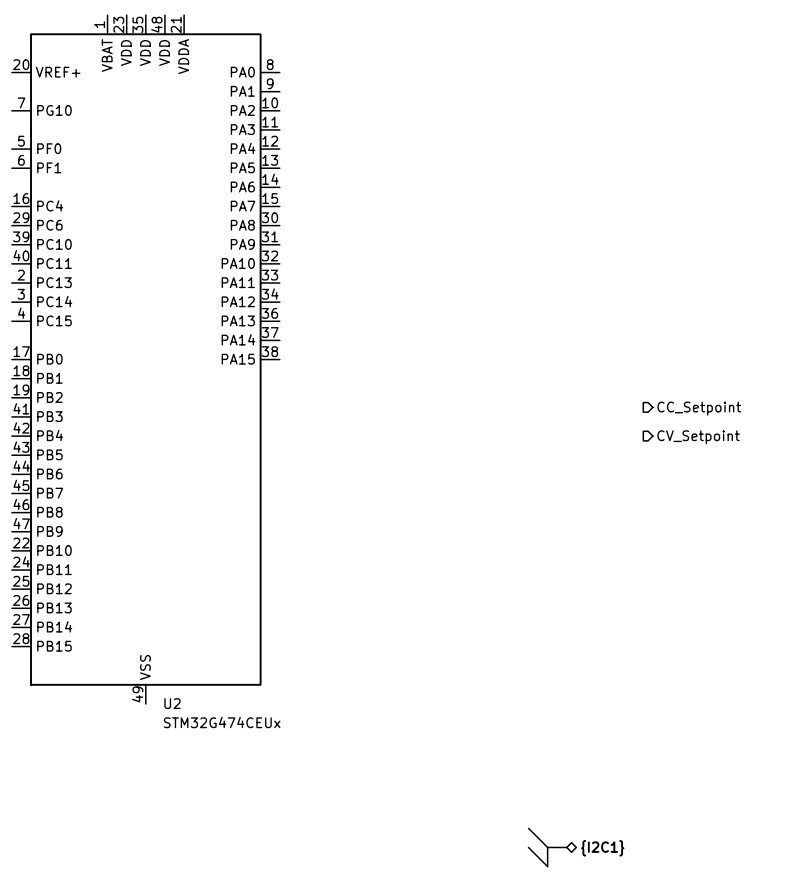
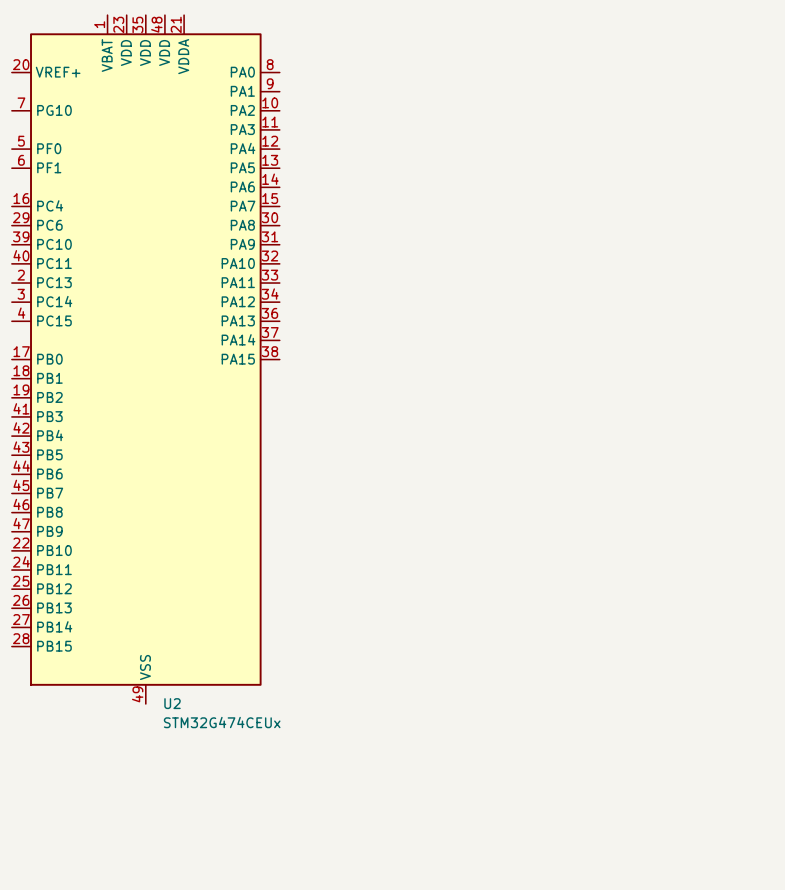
hierarchical label: CC_Setpoint (699, 408) -> none
hierarchical label: CV_Setpoint (698, 437) -> none
wire: (528, 828) (547, 847) -> none
wire: (528, 847) (547, 866) -> none
bus: (566, 847) (547, 847) (547, 866) -> none
hierarchical label: {I2C1} (602, 848) -> none

